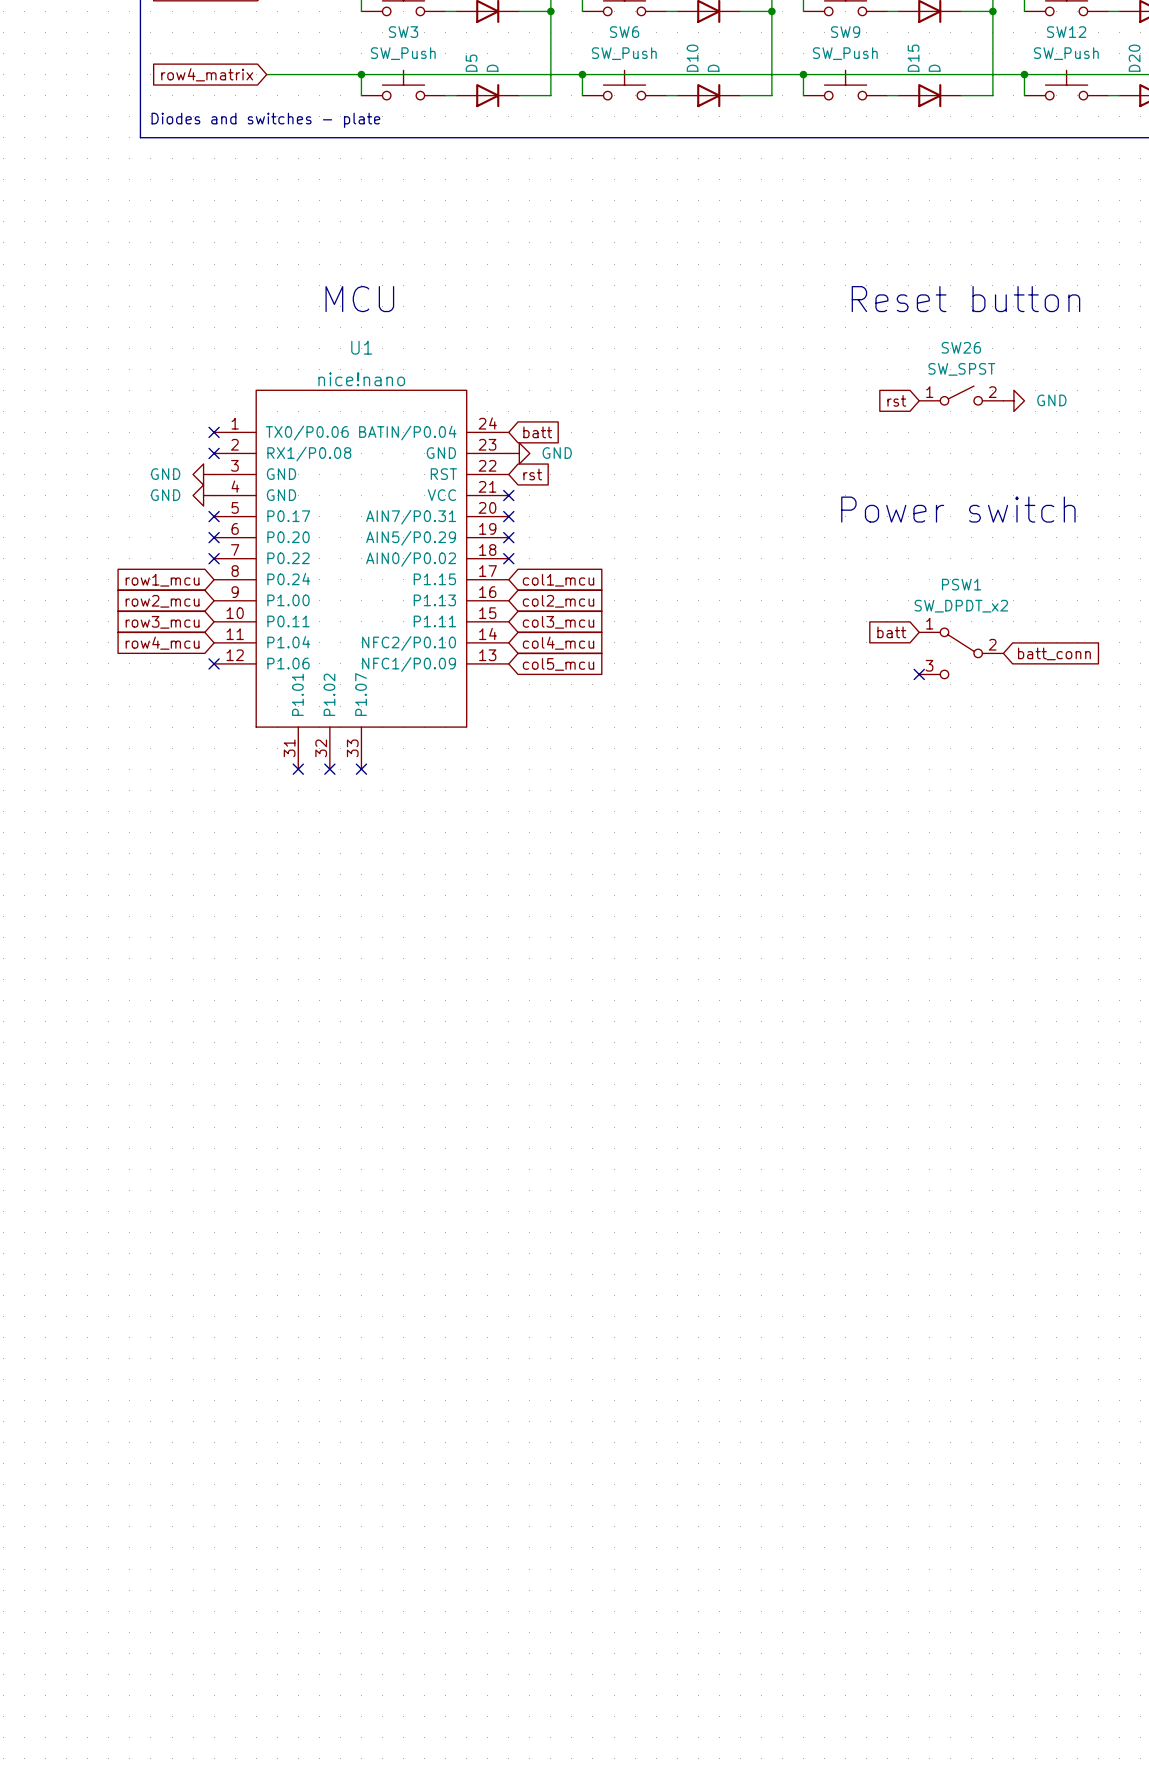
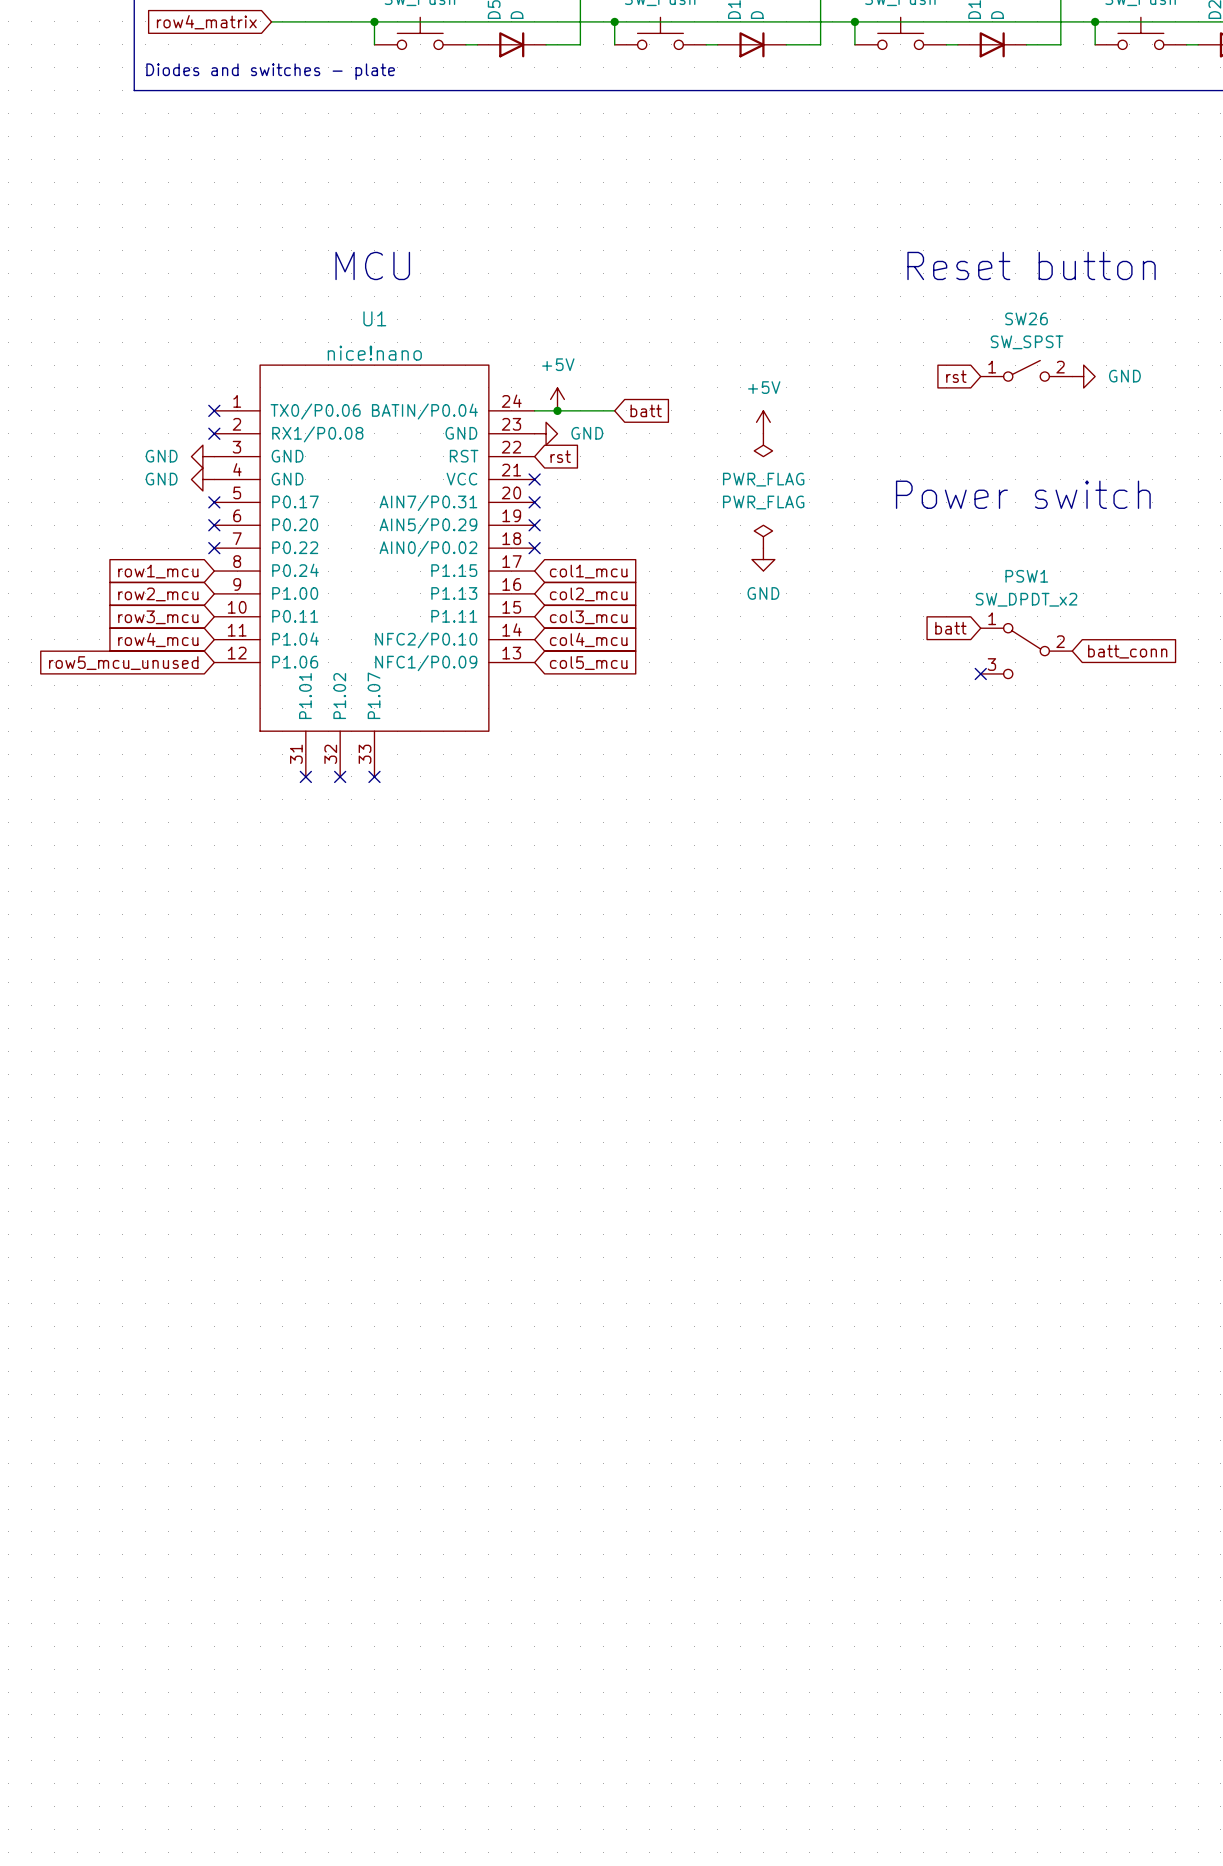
power symbol: none -> +5V (557, 399)
wire: none -> (534, 410) (614, 410)
junction: none -> (557, 410)
global label position: batt (537, 432) -> batt (646, 410)
power symbol: none -> +5V (763, 422)
power symbol: none -> PWR_FLAG (763, 445)
power symbol: none -> PWR_FLAG (763, 536)
power symbol: none -> GND (763, 559)
no-connect mark: (214, 663) -> none
global label: none -> row5_mcu_unused (123, 663)

